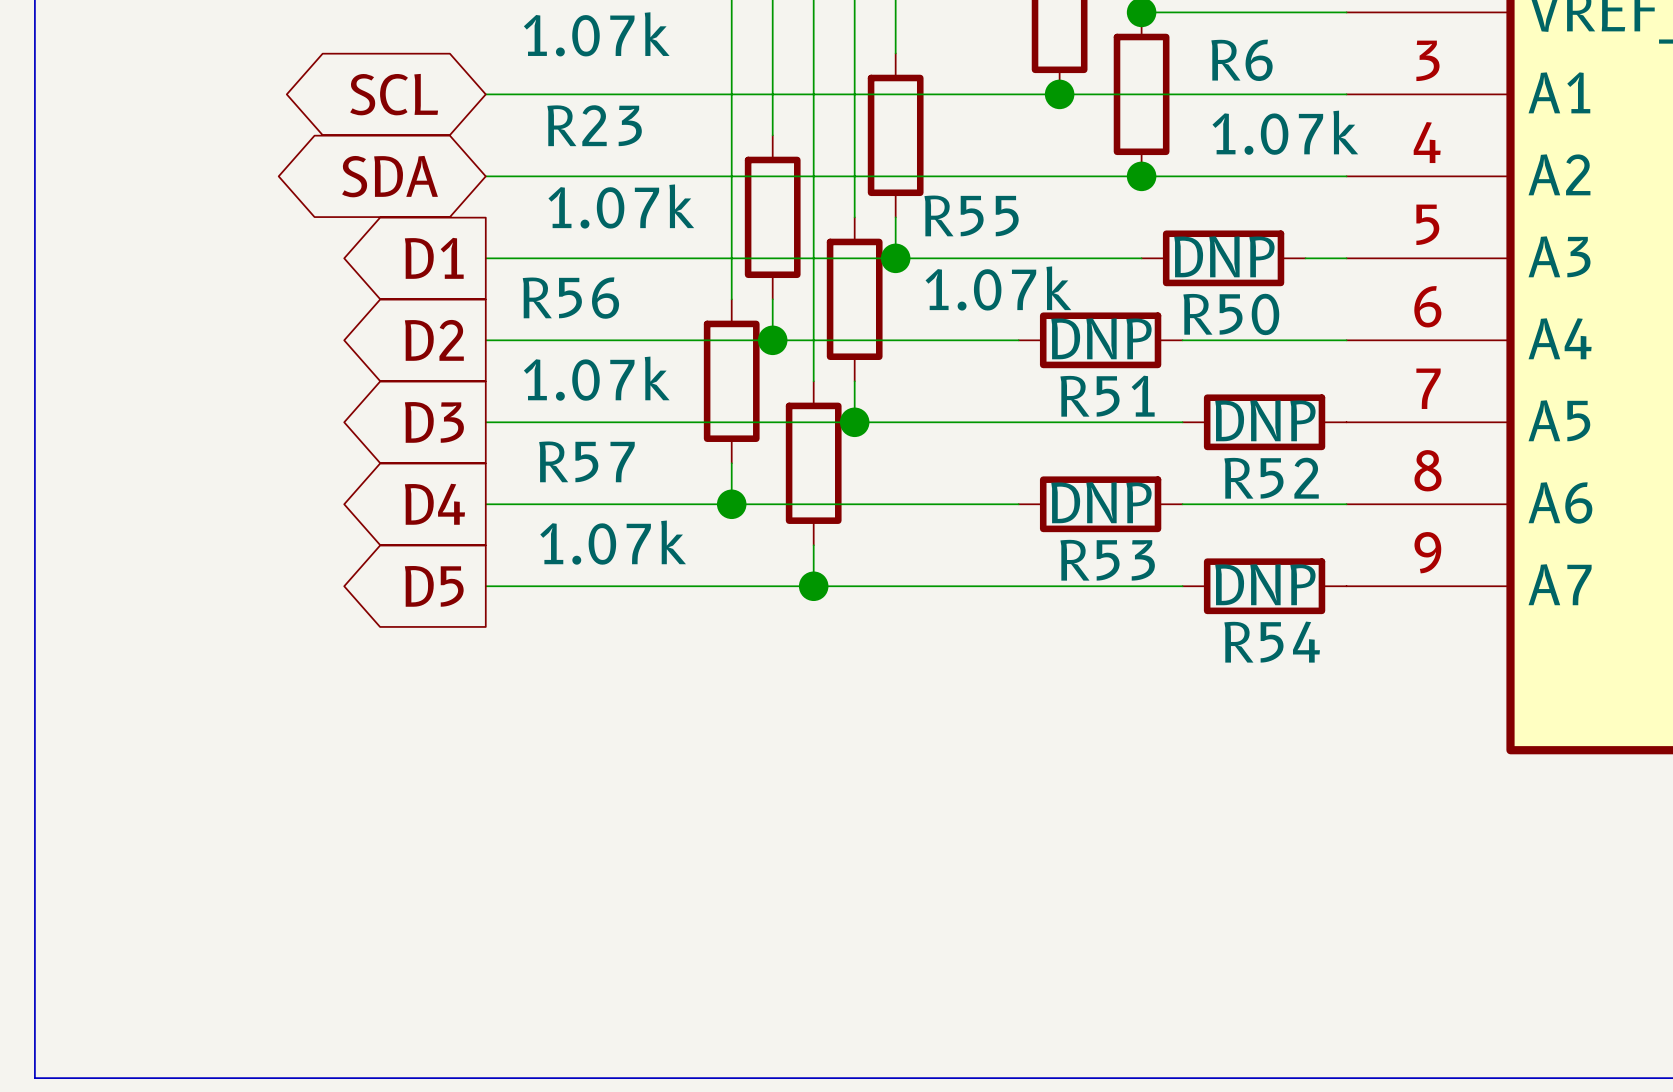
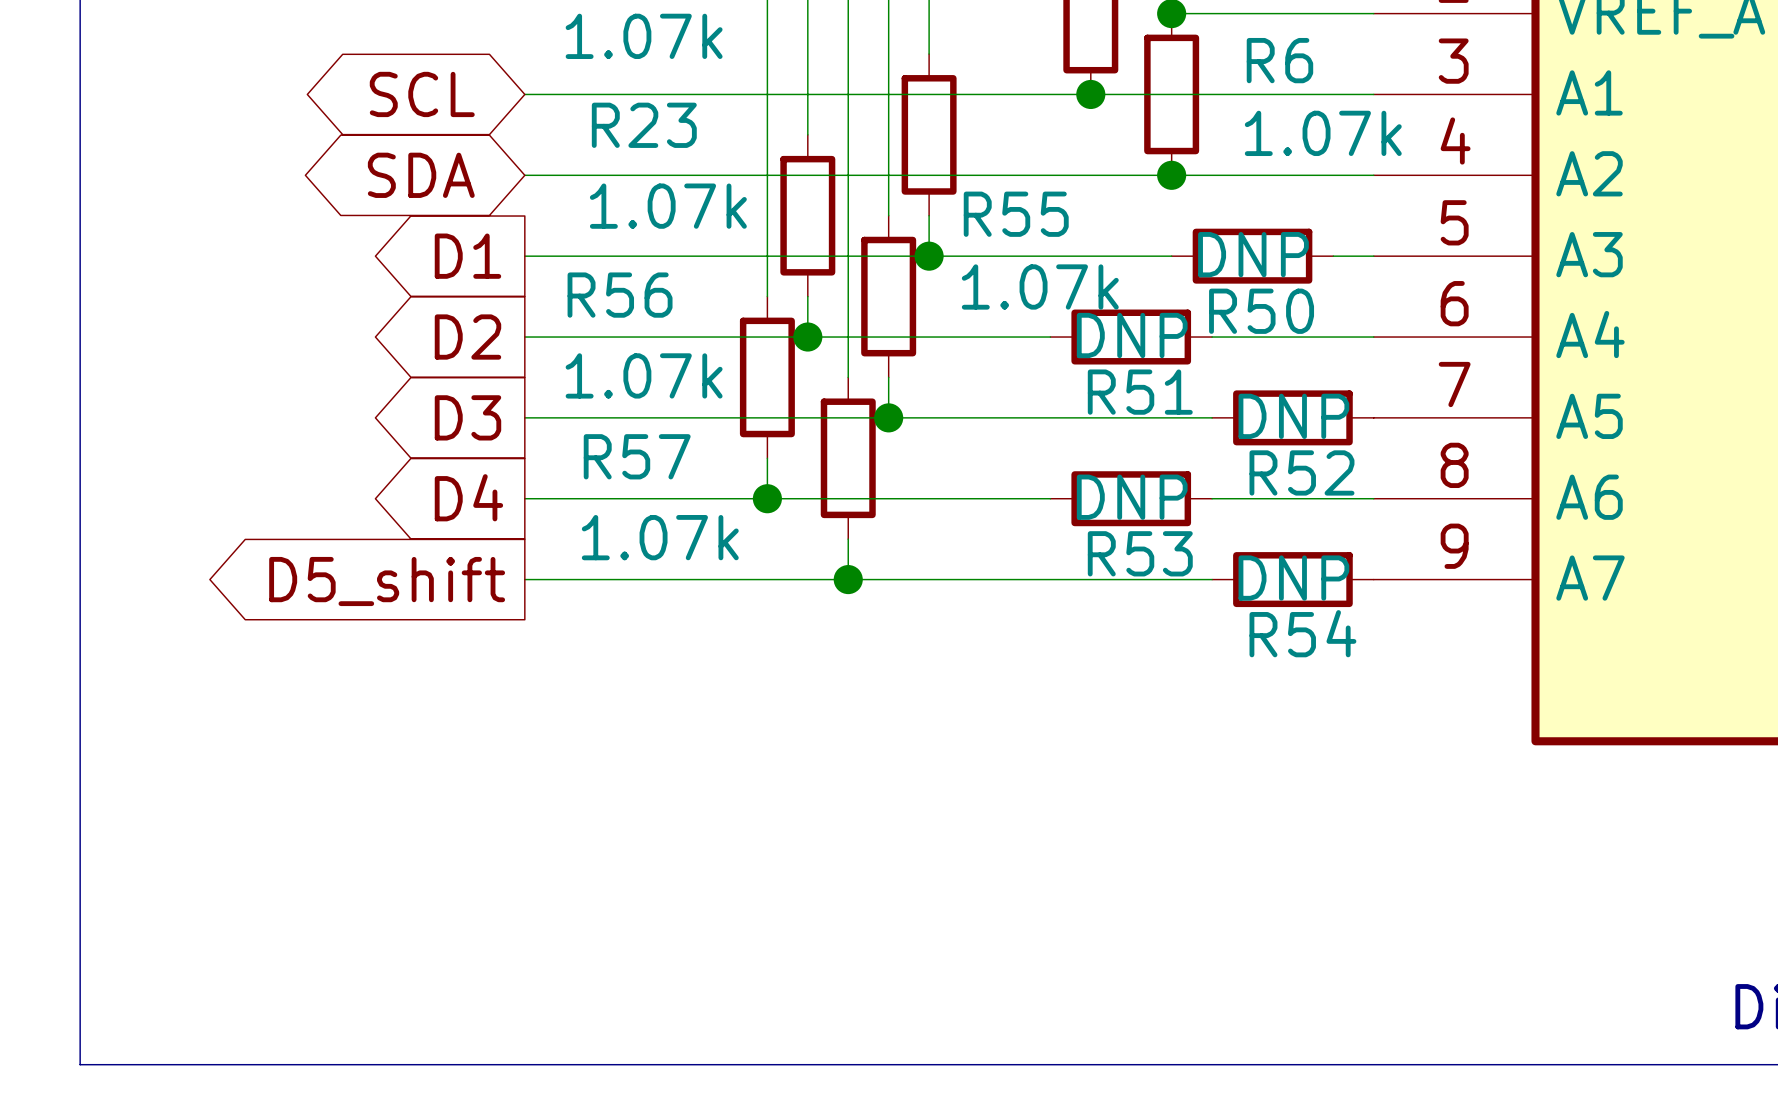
global label: D5 (434, 586) -> D5_shift (387, 581)

